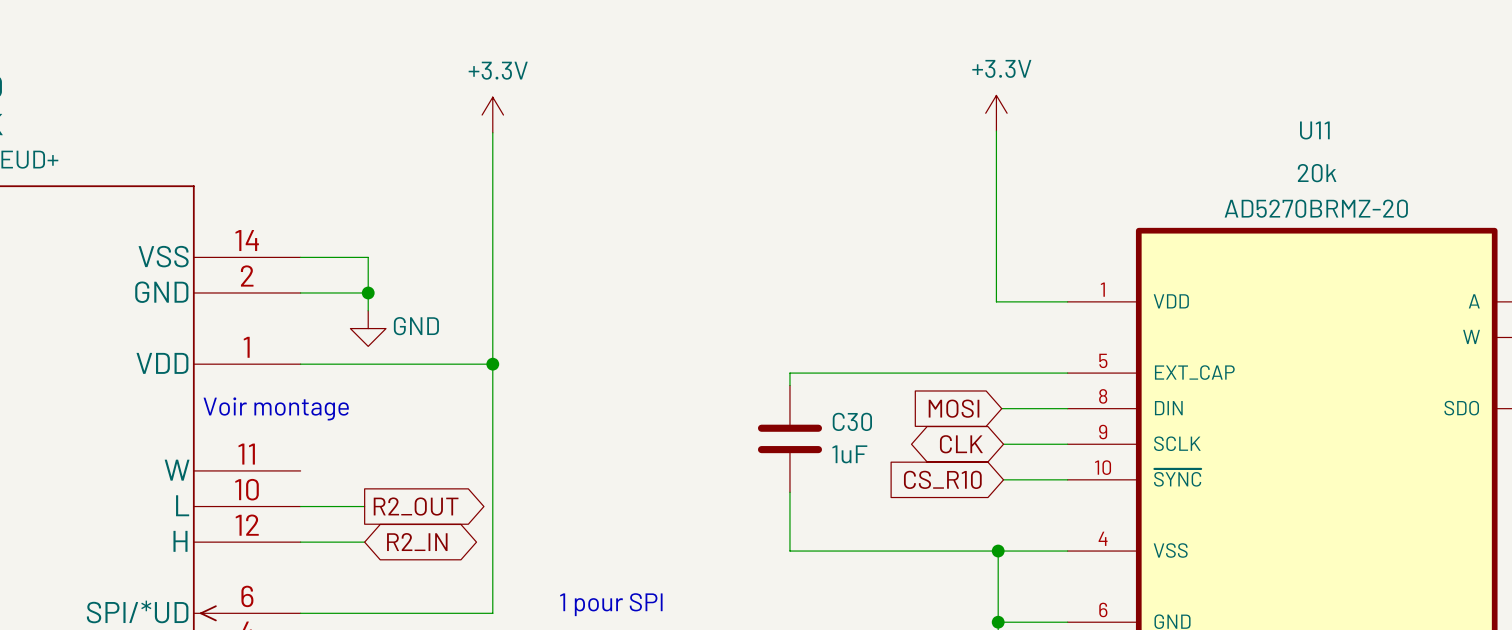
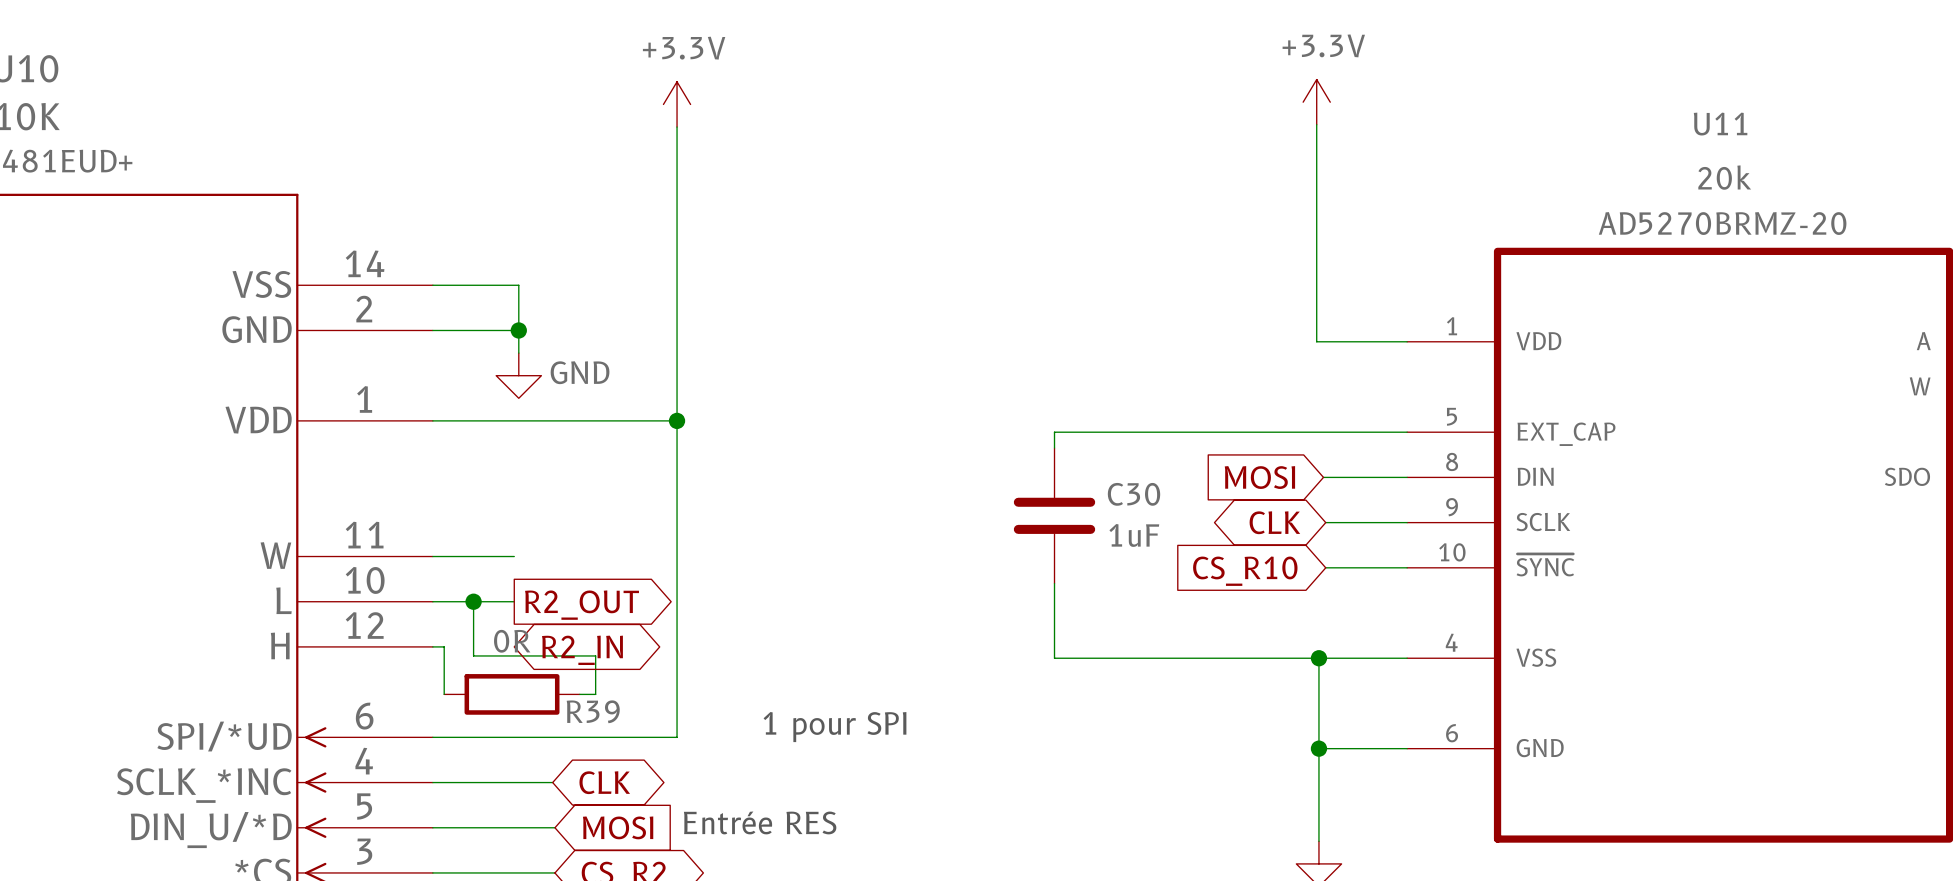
text: Voir montage (276, 408) -> none
wire: none -> (432, 556) (514, 556)
wire: none -> (473, 601) (473, 655) (595, 655) (595, 694) (579, 694)
junction: none -> (473, 601)
wire: (309, 542) (364, 542) -> (444, 646) (444, 694)
R39: none -> 0R (512, 694)

